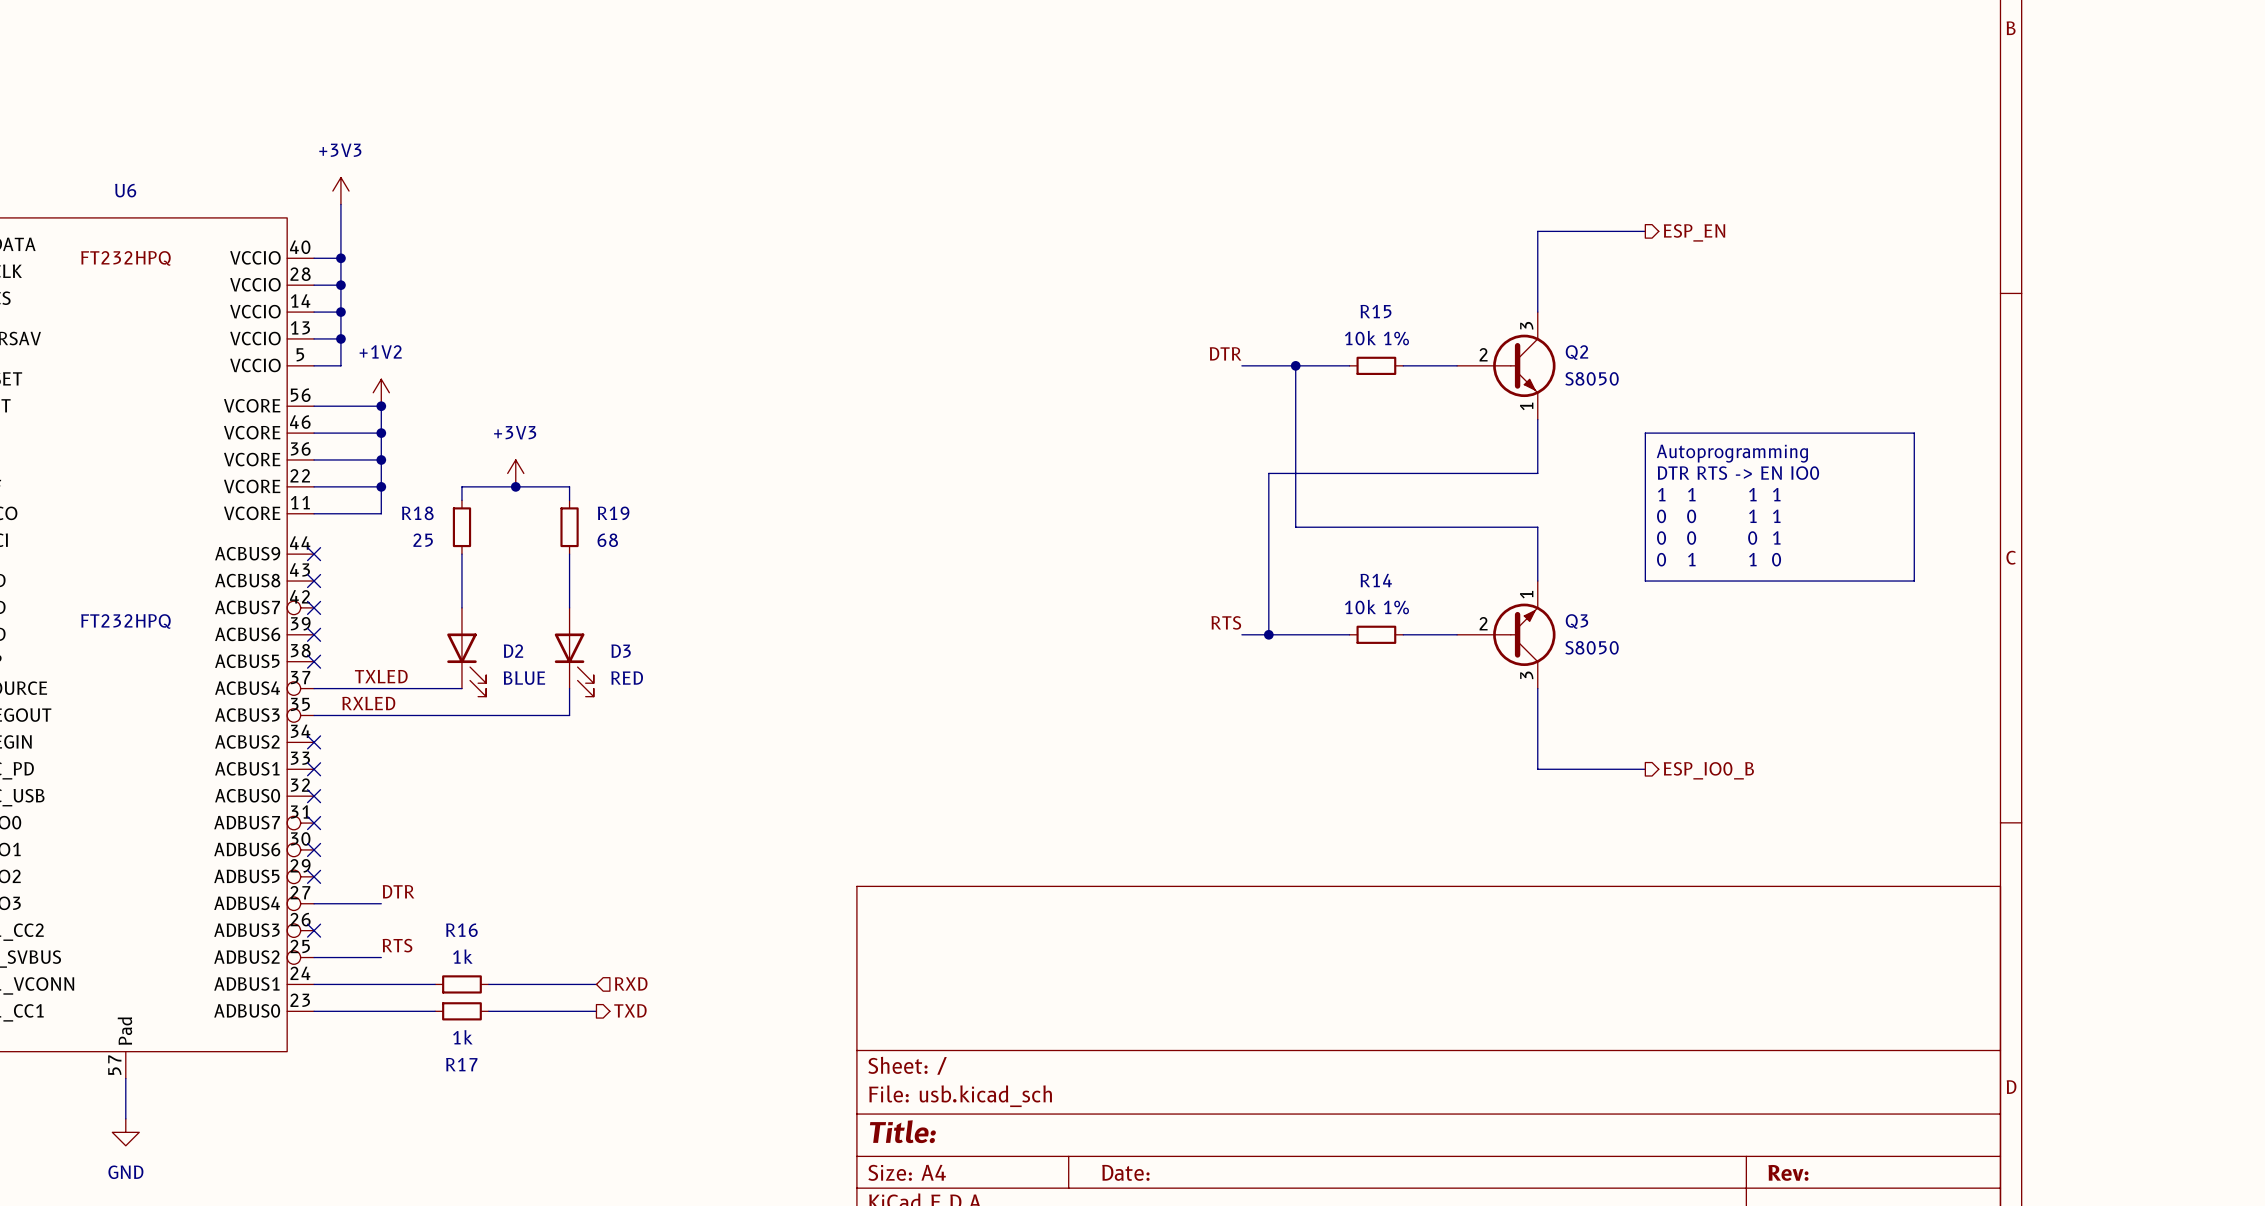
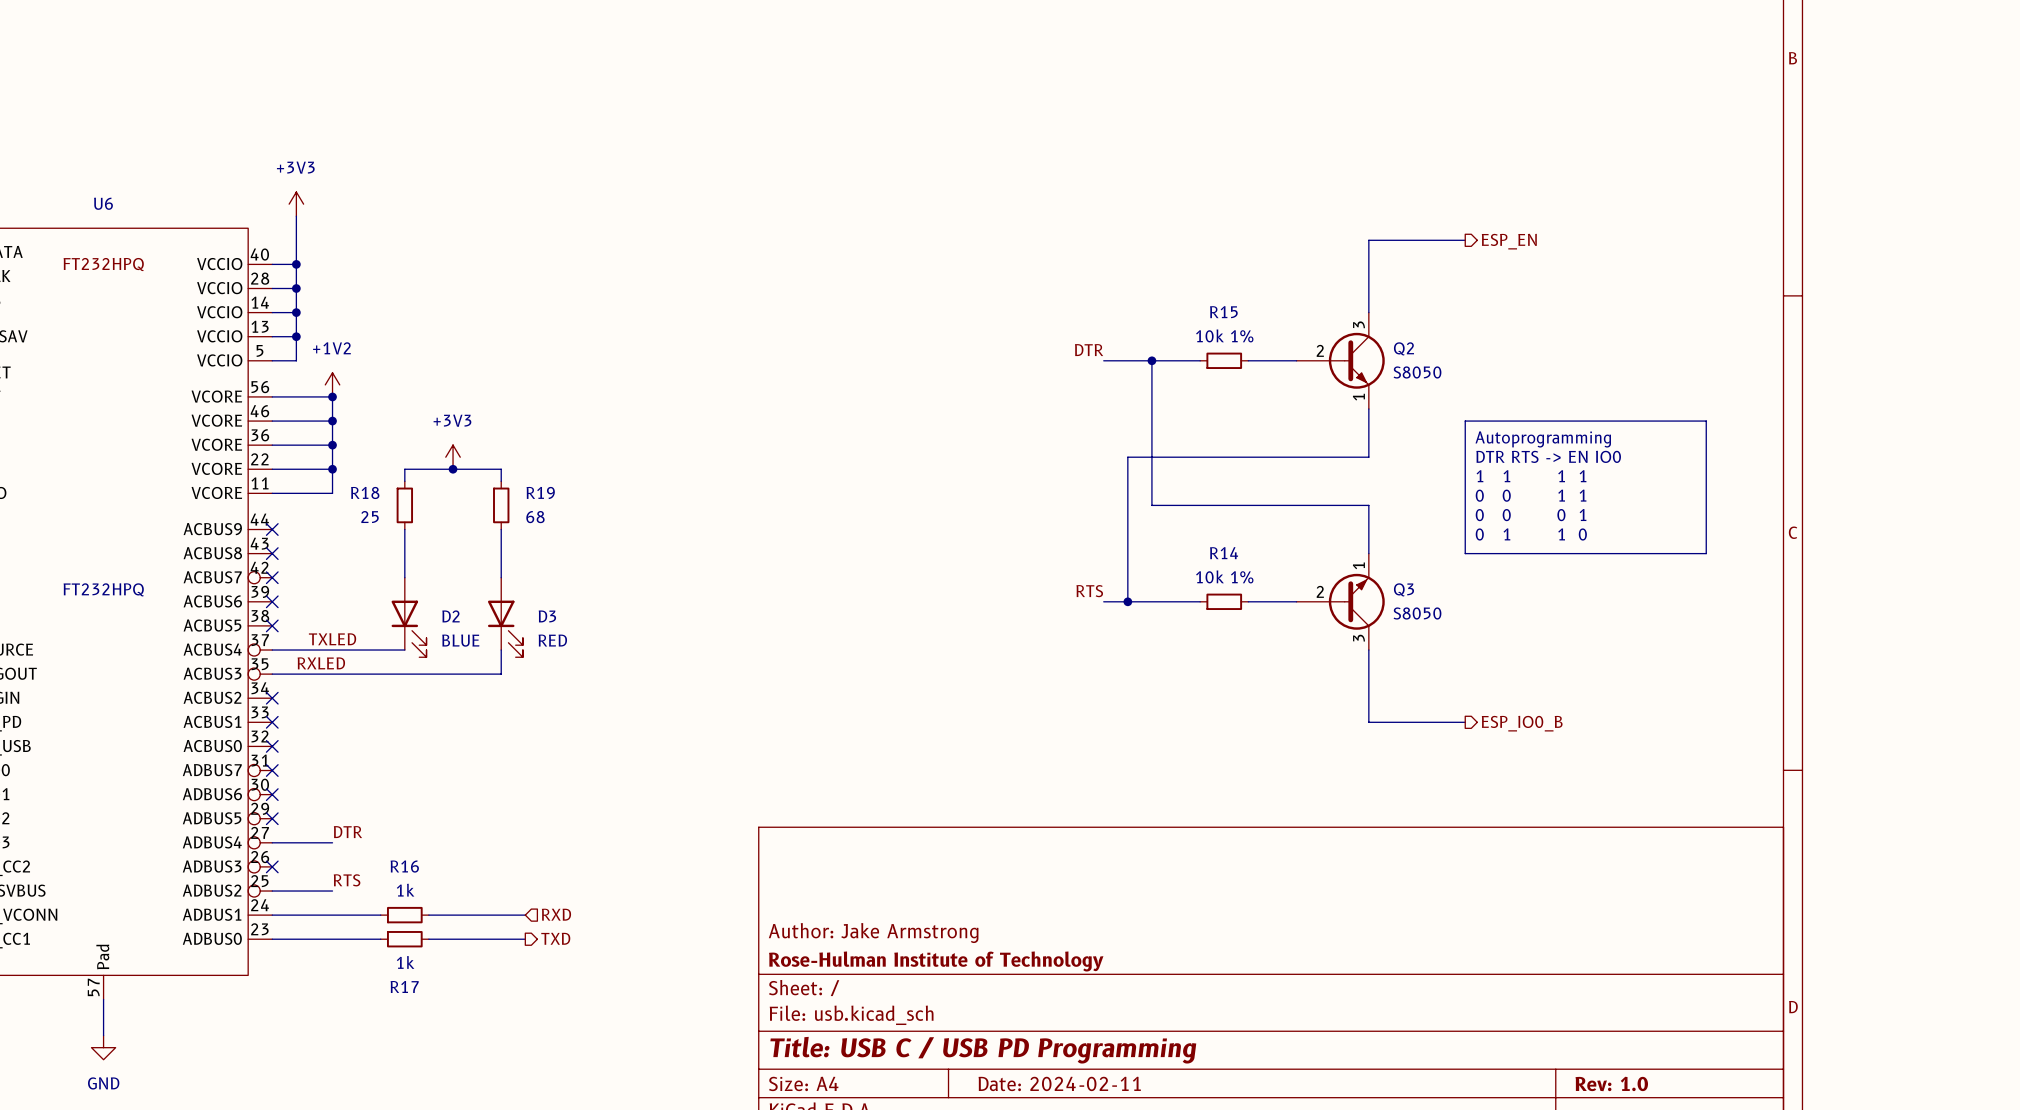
title block: none -> Author: Jake Armstrong (873, 933)
title block: none -> Rose-Hulman Institute of Technology (936, 961)
title block: Title: (902, 1131) -> Title: USB C / USB PD Programming (983, 1050)
title block: Date: (1125, 1172) -> Date: 2024-02-11 (1059, 1083)
title block: Rev: (1788, 1172) -> Rev: 1.0 (1611, 1083)

